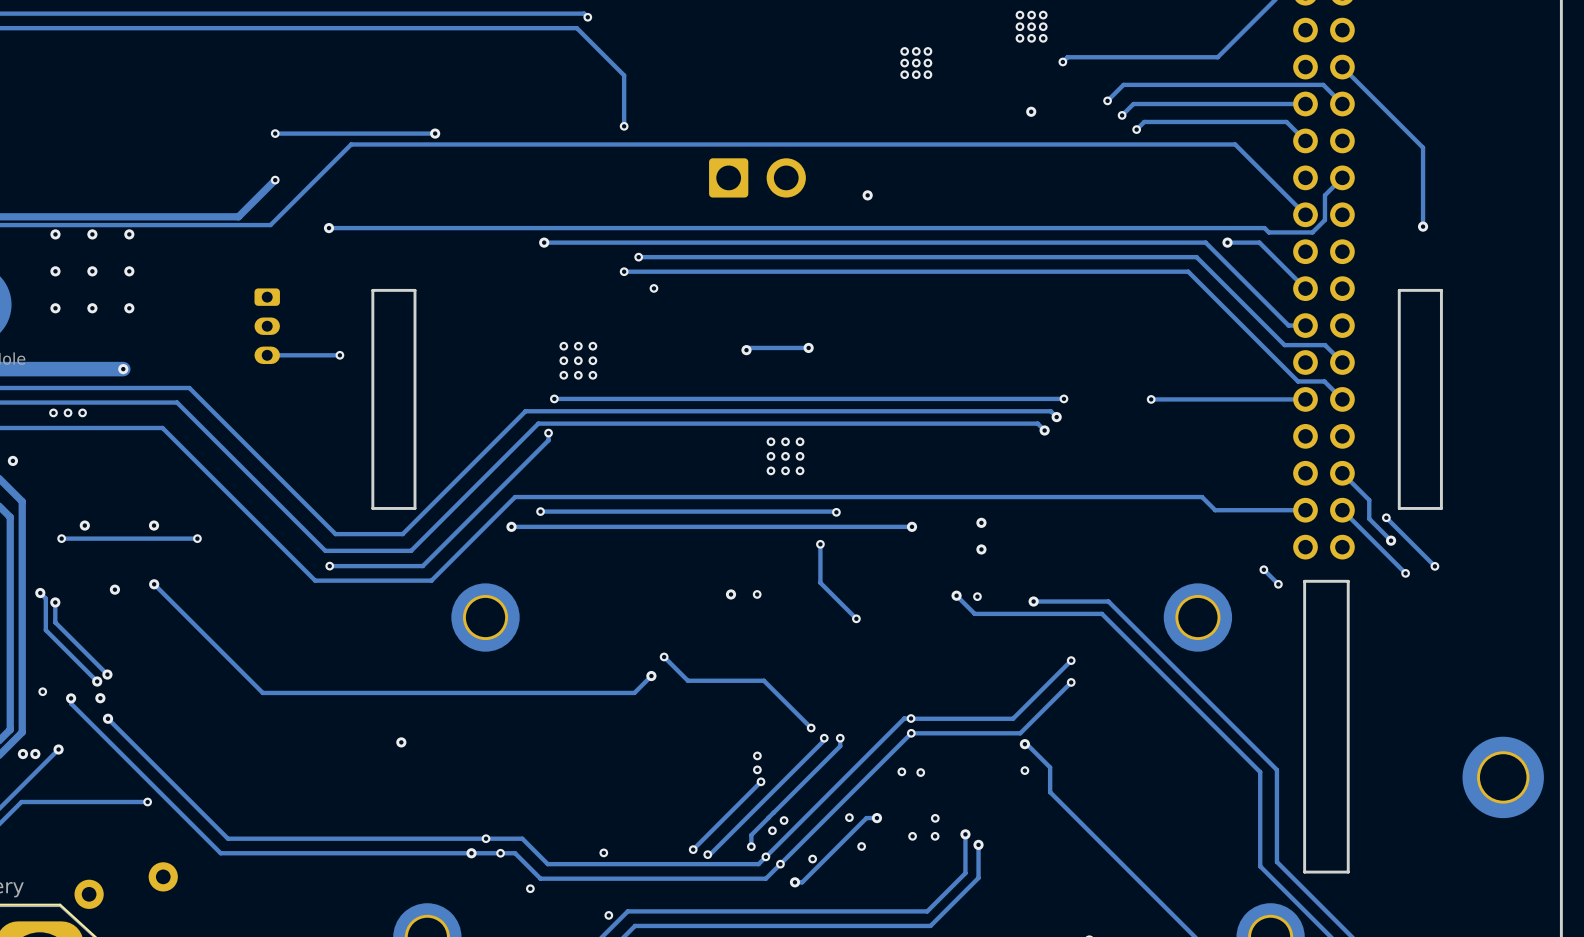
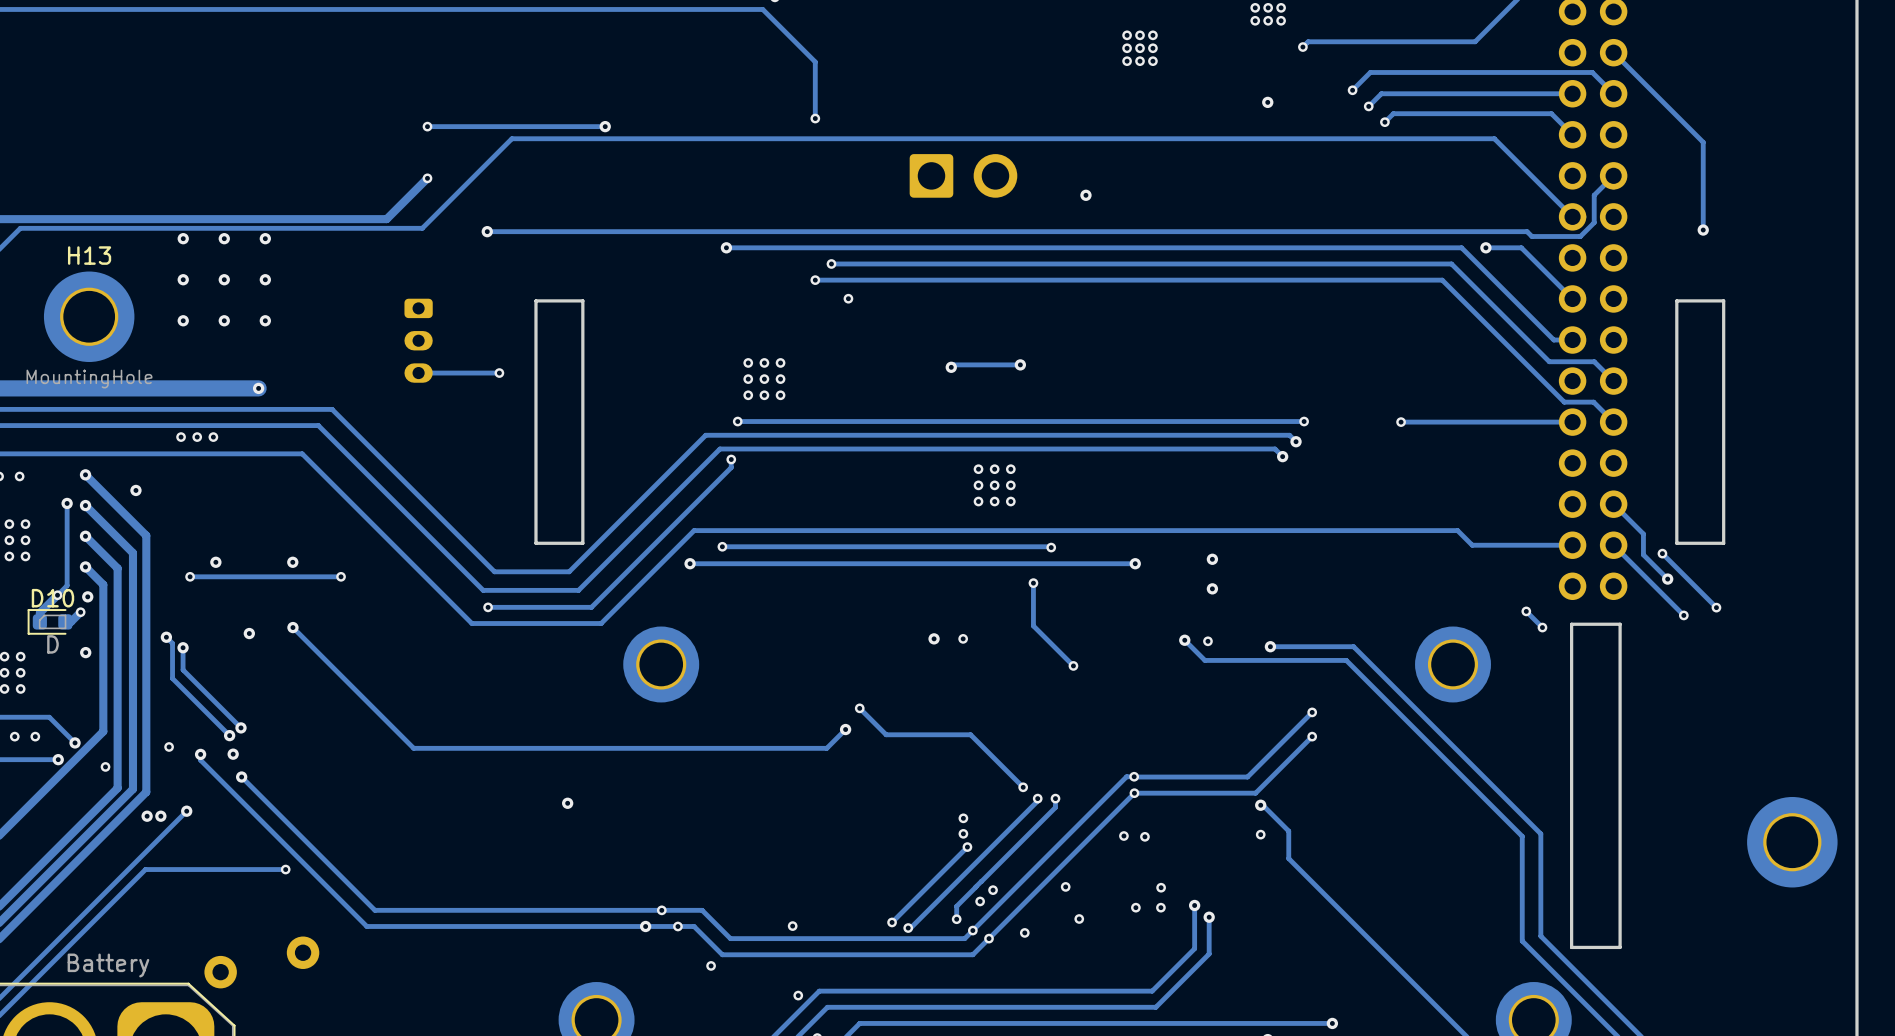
track: (876, 818) (866, 818) (802, 882) (794, 882) -> none
via: (876, 818) -> none
via: (794, 882) -> none

